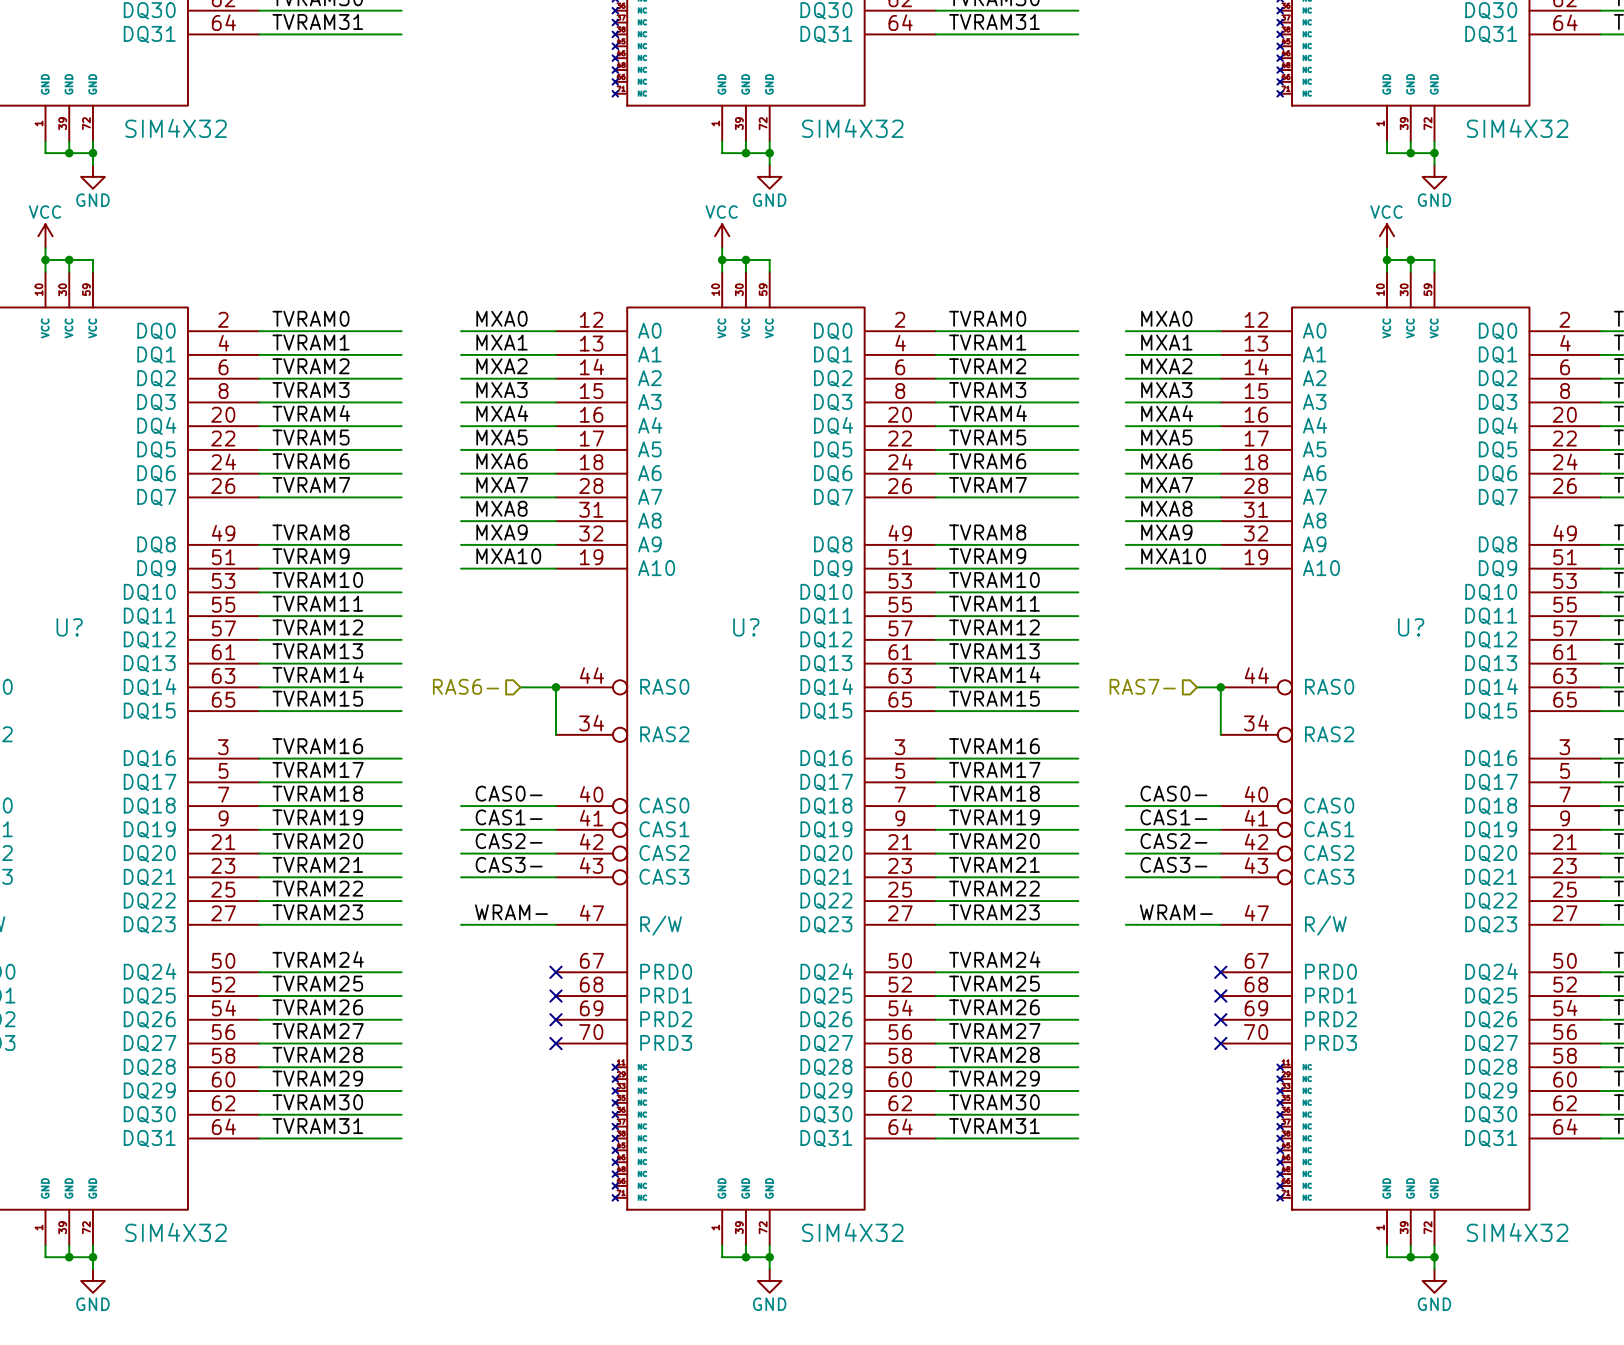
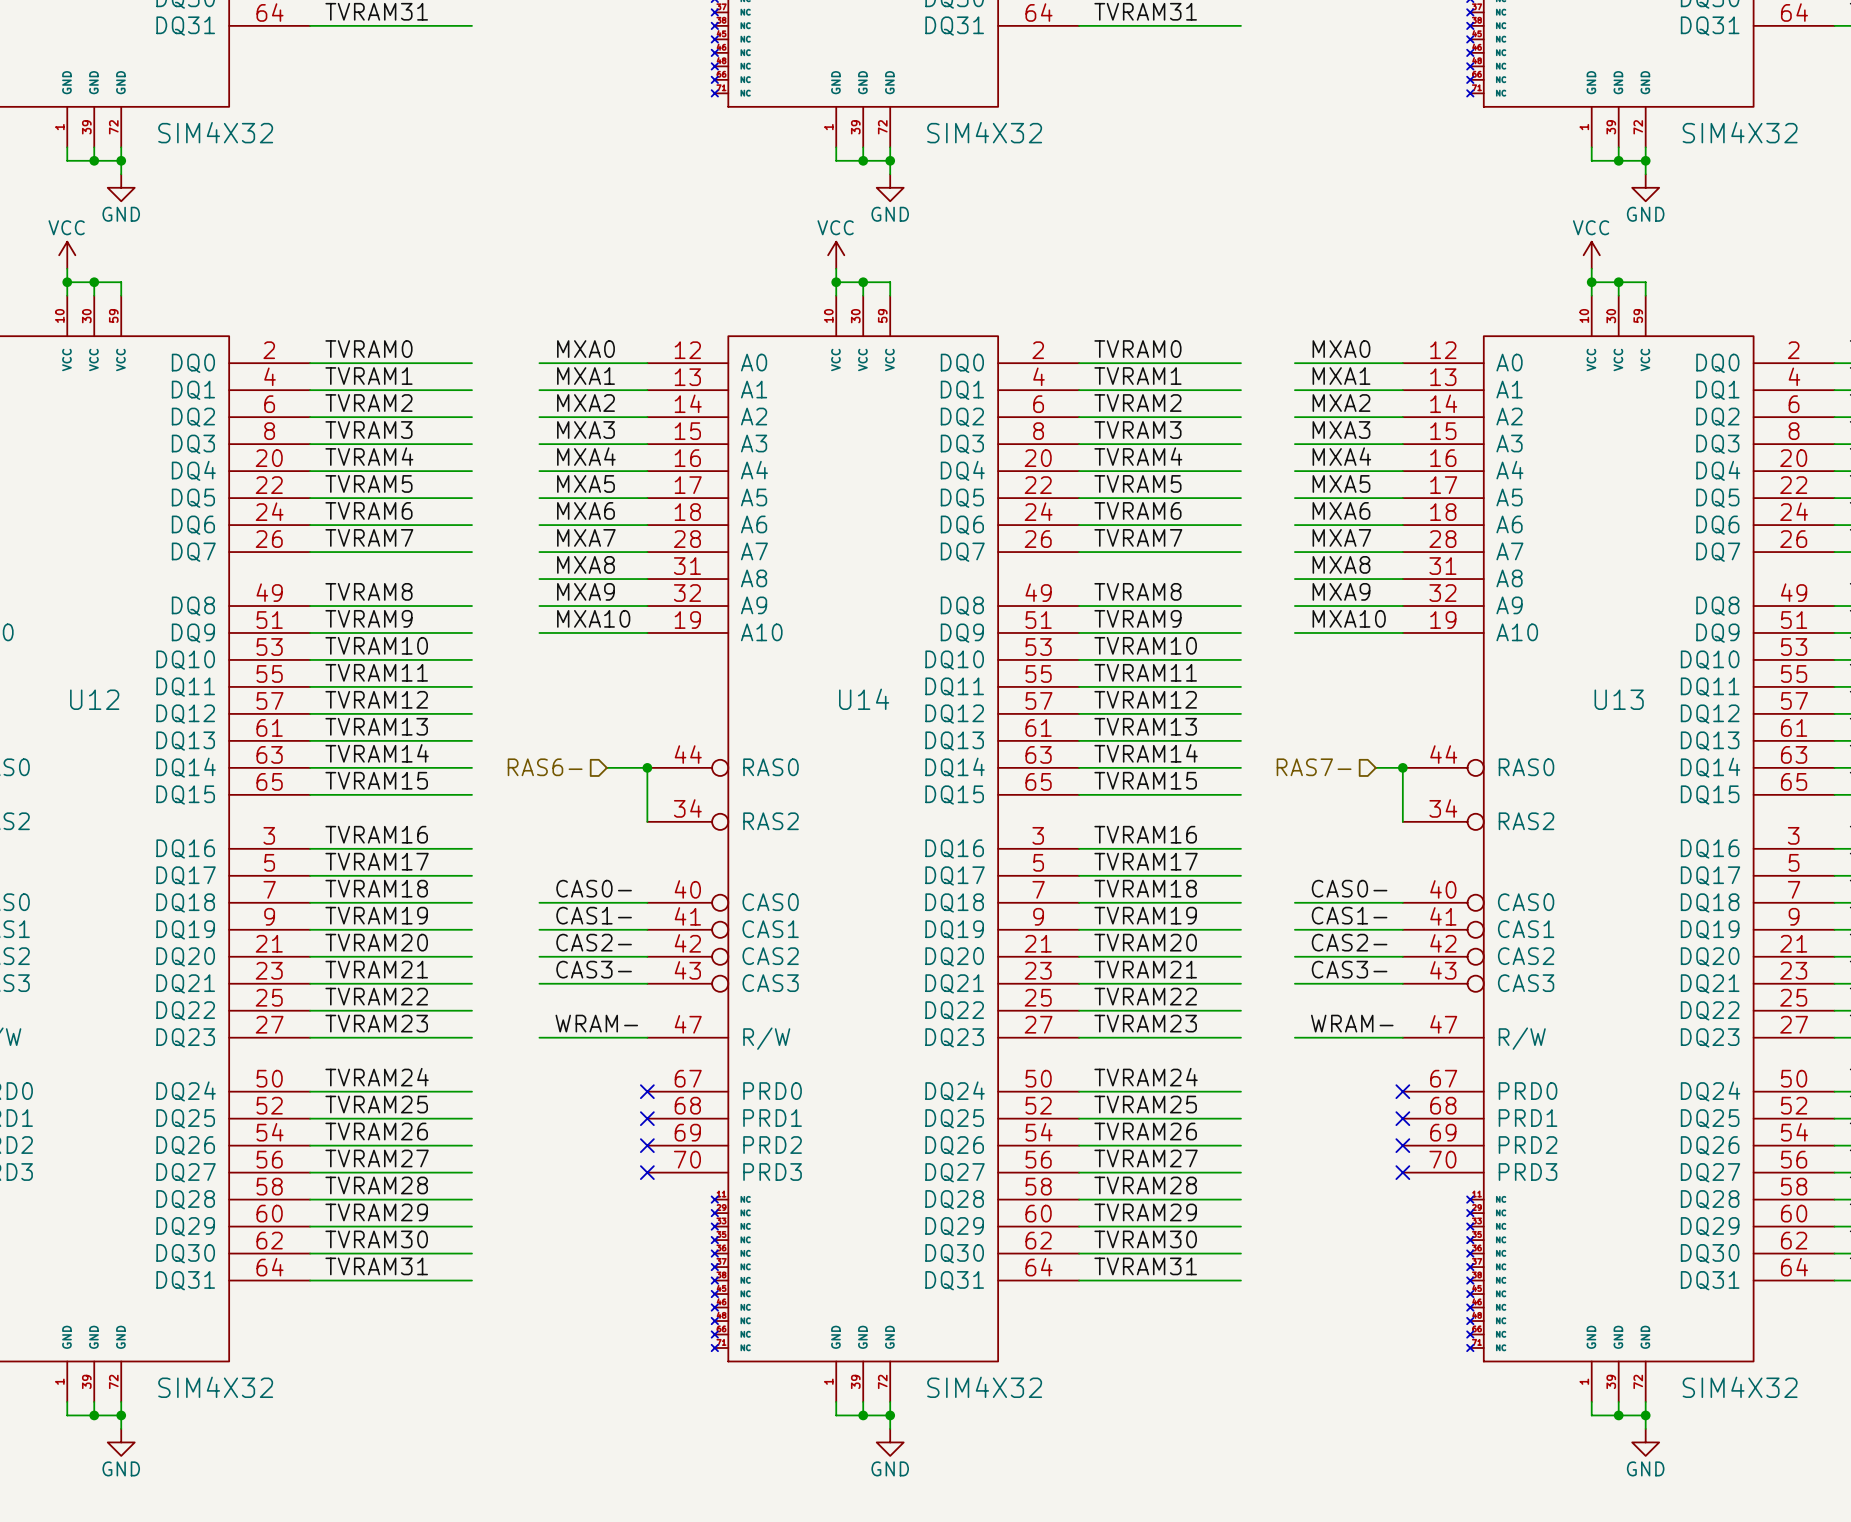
U? name: U? (69, 627) -> U12 (94, 699)
U? name: U? (746, 627) -> U14 (864, 699)
U? name: U? (1411, 627) -> U13 (1619, 699)

